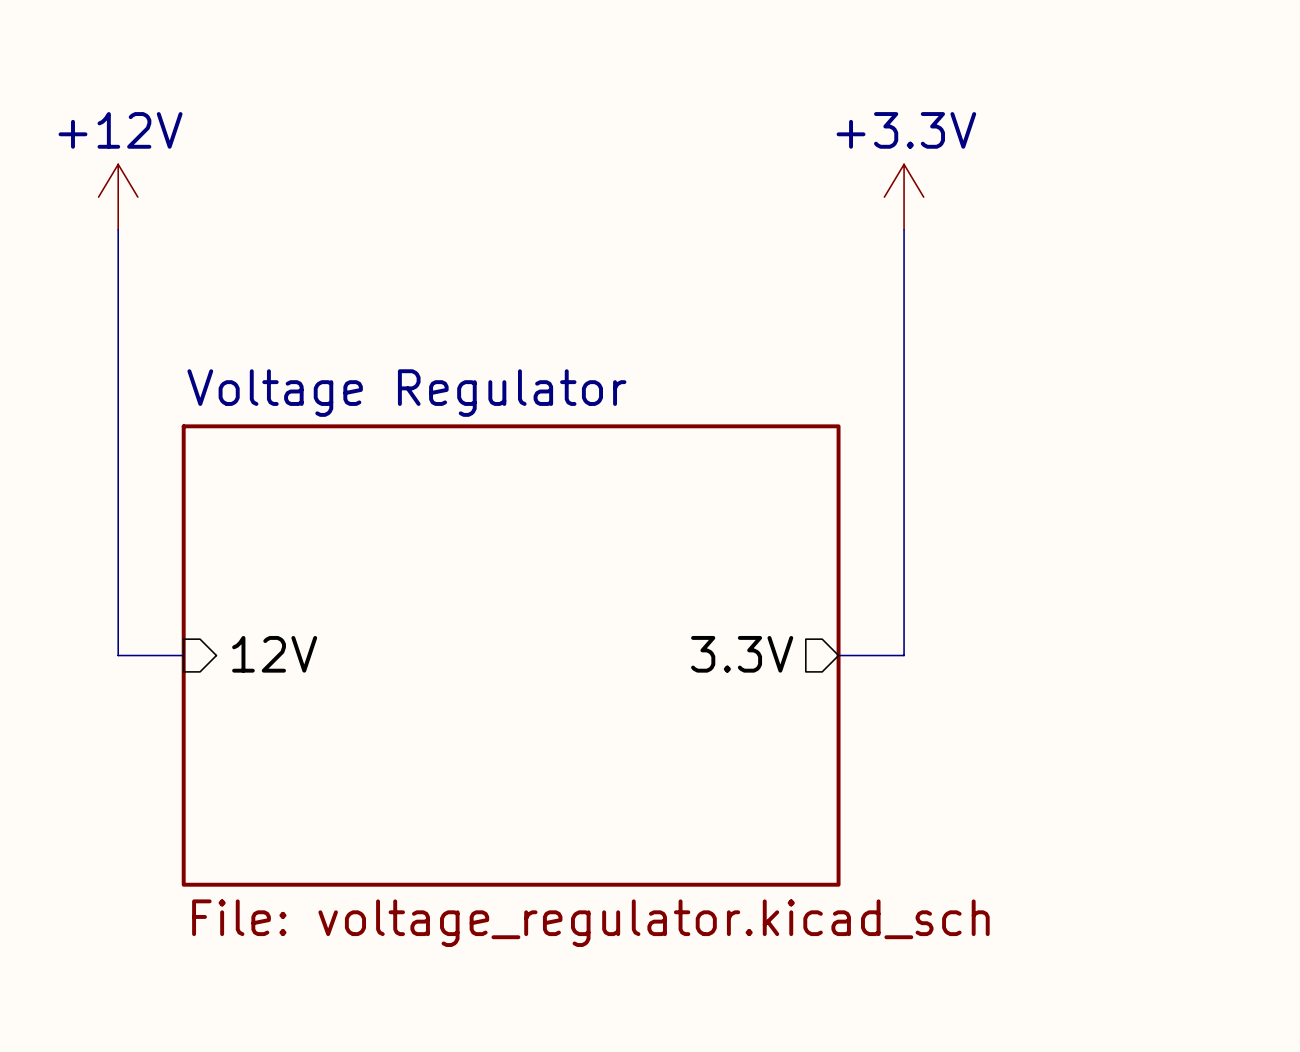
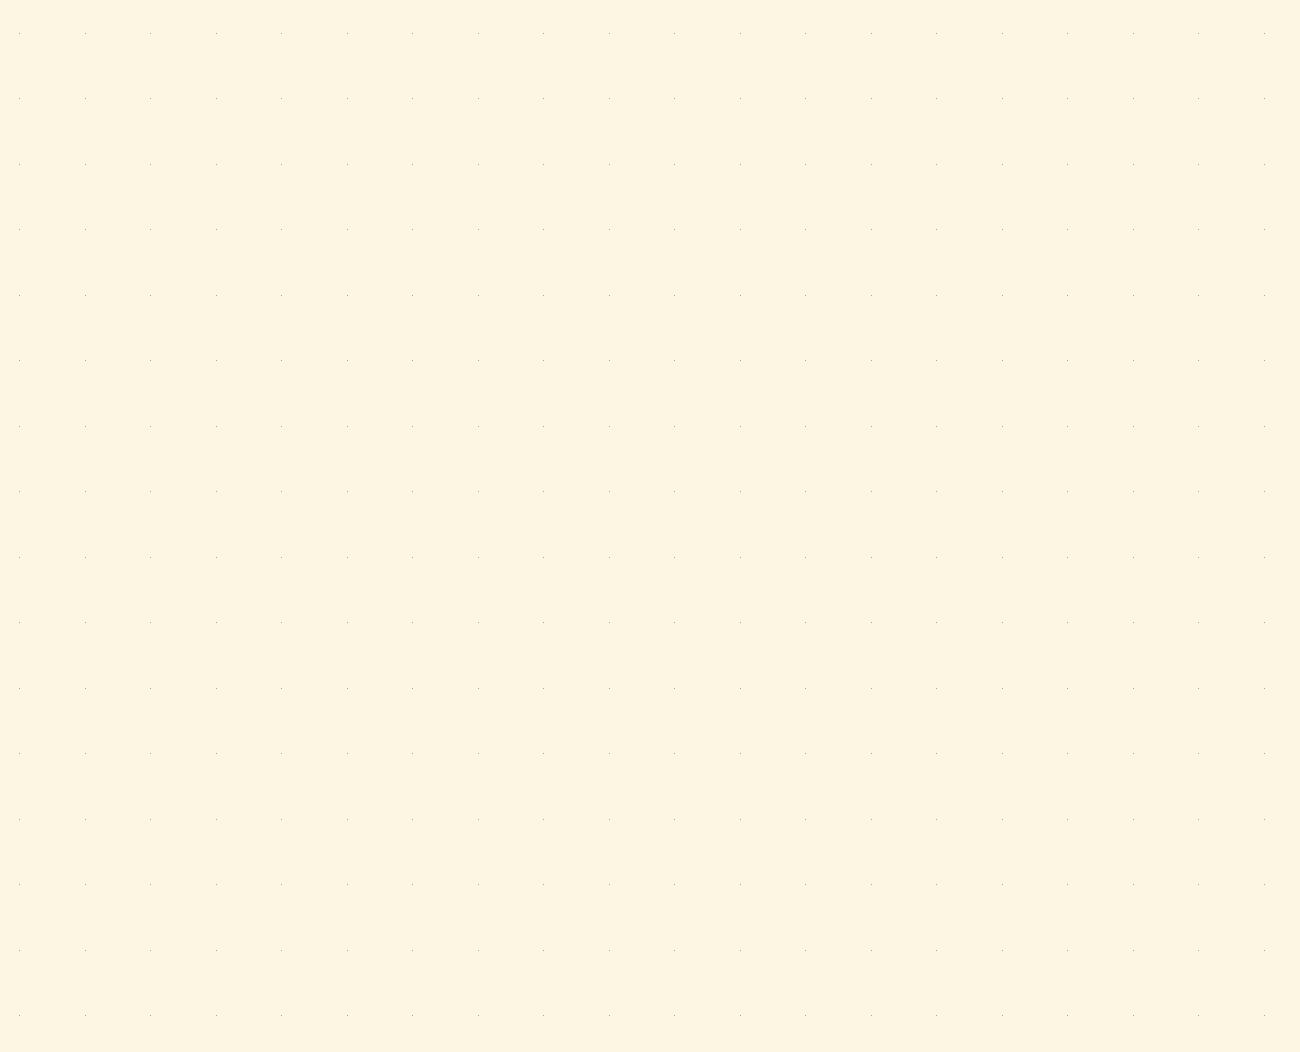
power symbol: +12V (118, 197) -> none
power symbol: +3.3V (904, 197) -> none
wire: (118, 229) (118, 655) (183, 655) -> none
wire: (904, 229) (904, 655) (838, 655) -> none
sheet pin: 12V (274, 654) -> none
sheet pin: 3.3V (742, 654) -> none
sheet Voltage Regulator: File: voltage_regulator.kicad_sch (511, 655) -> none

